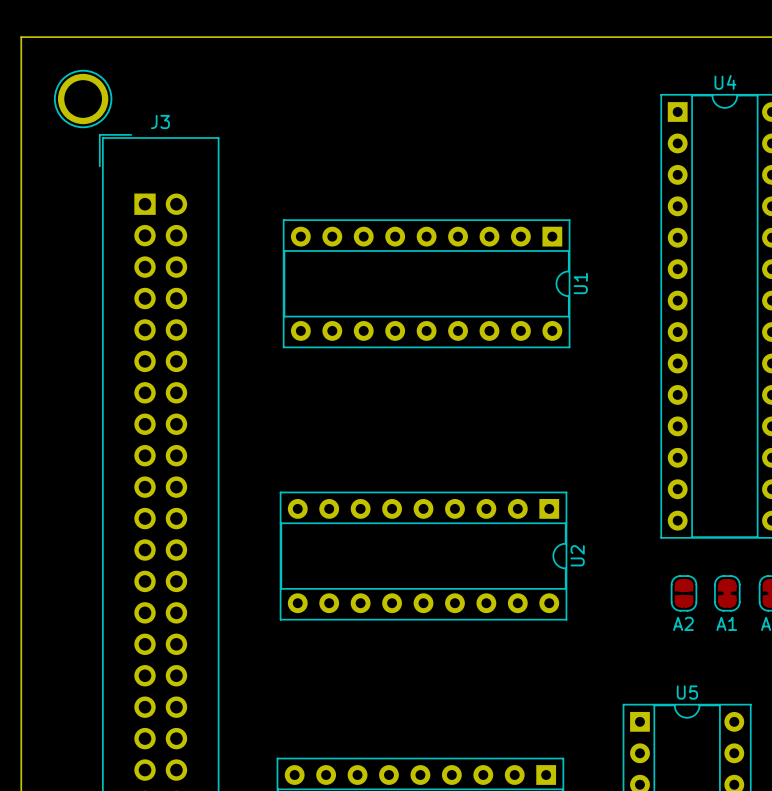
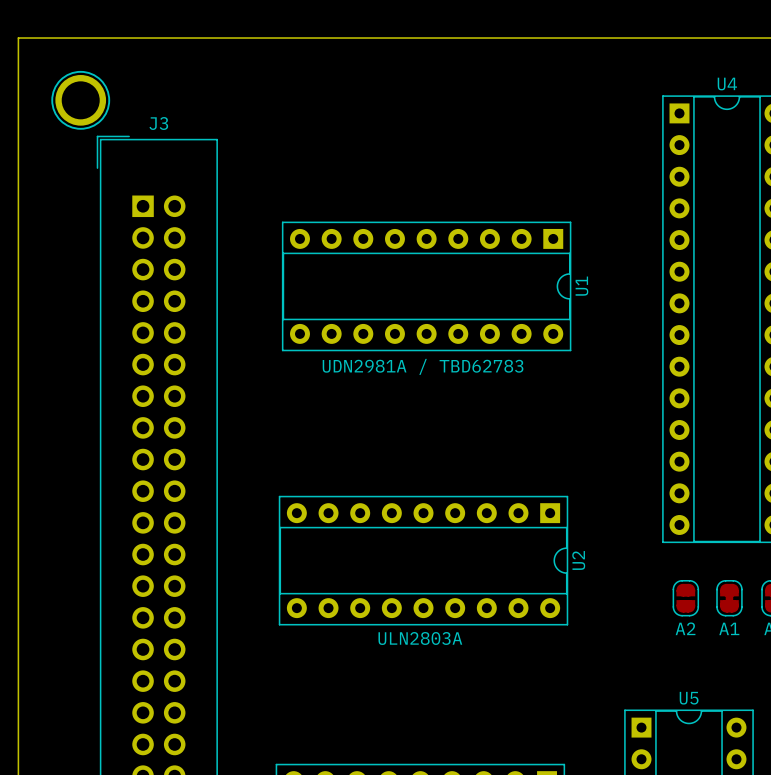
text: none -> UDN2981A / TBD62783 (423, 366)
text: none -> ULN2803A (420, 638)

